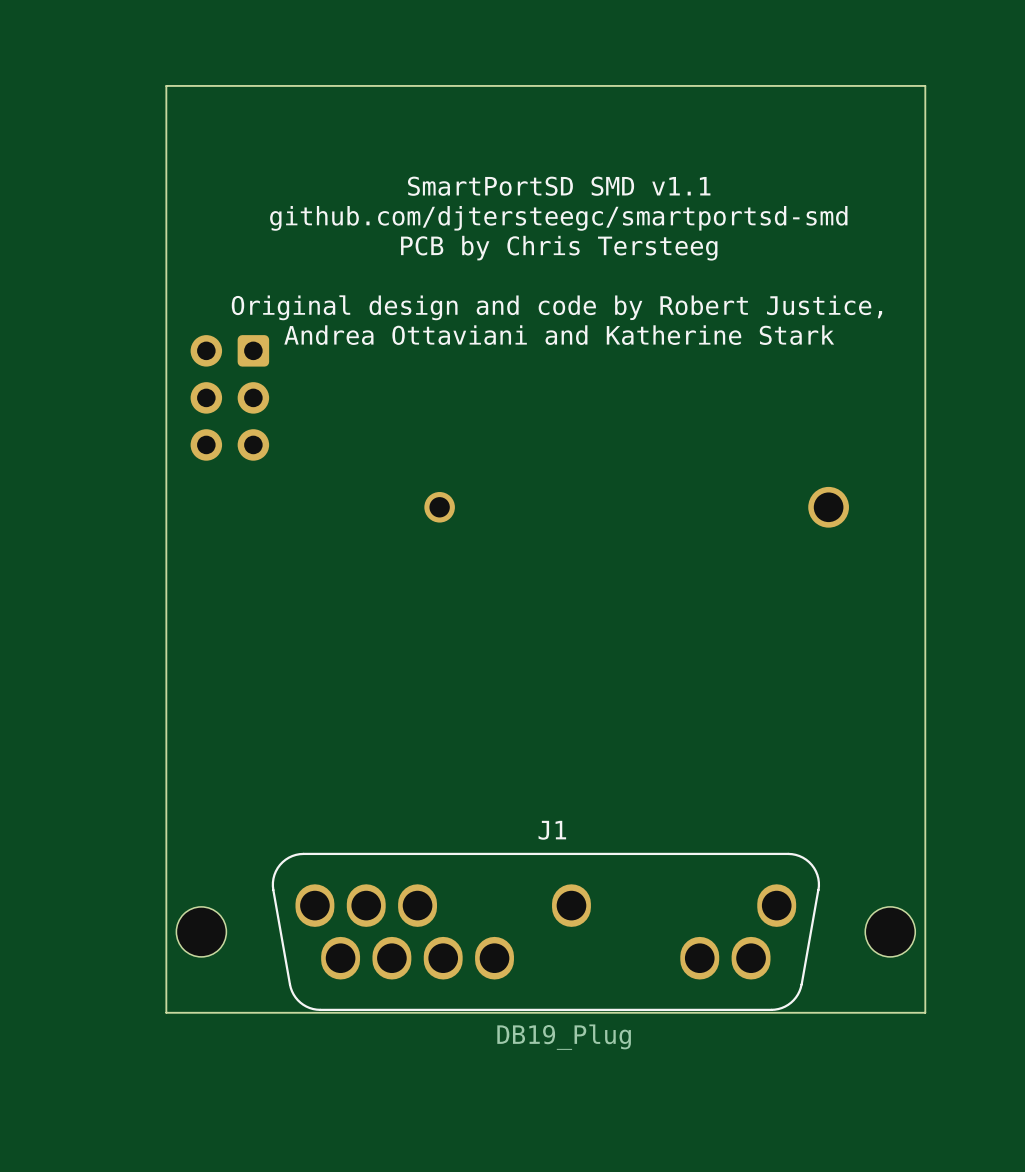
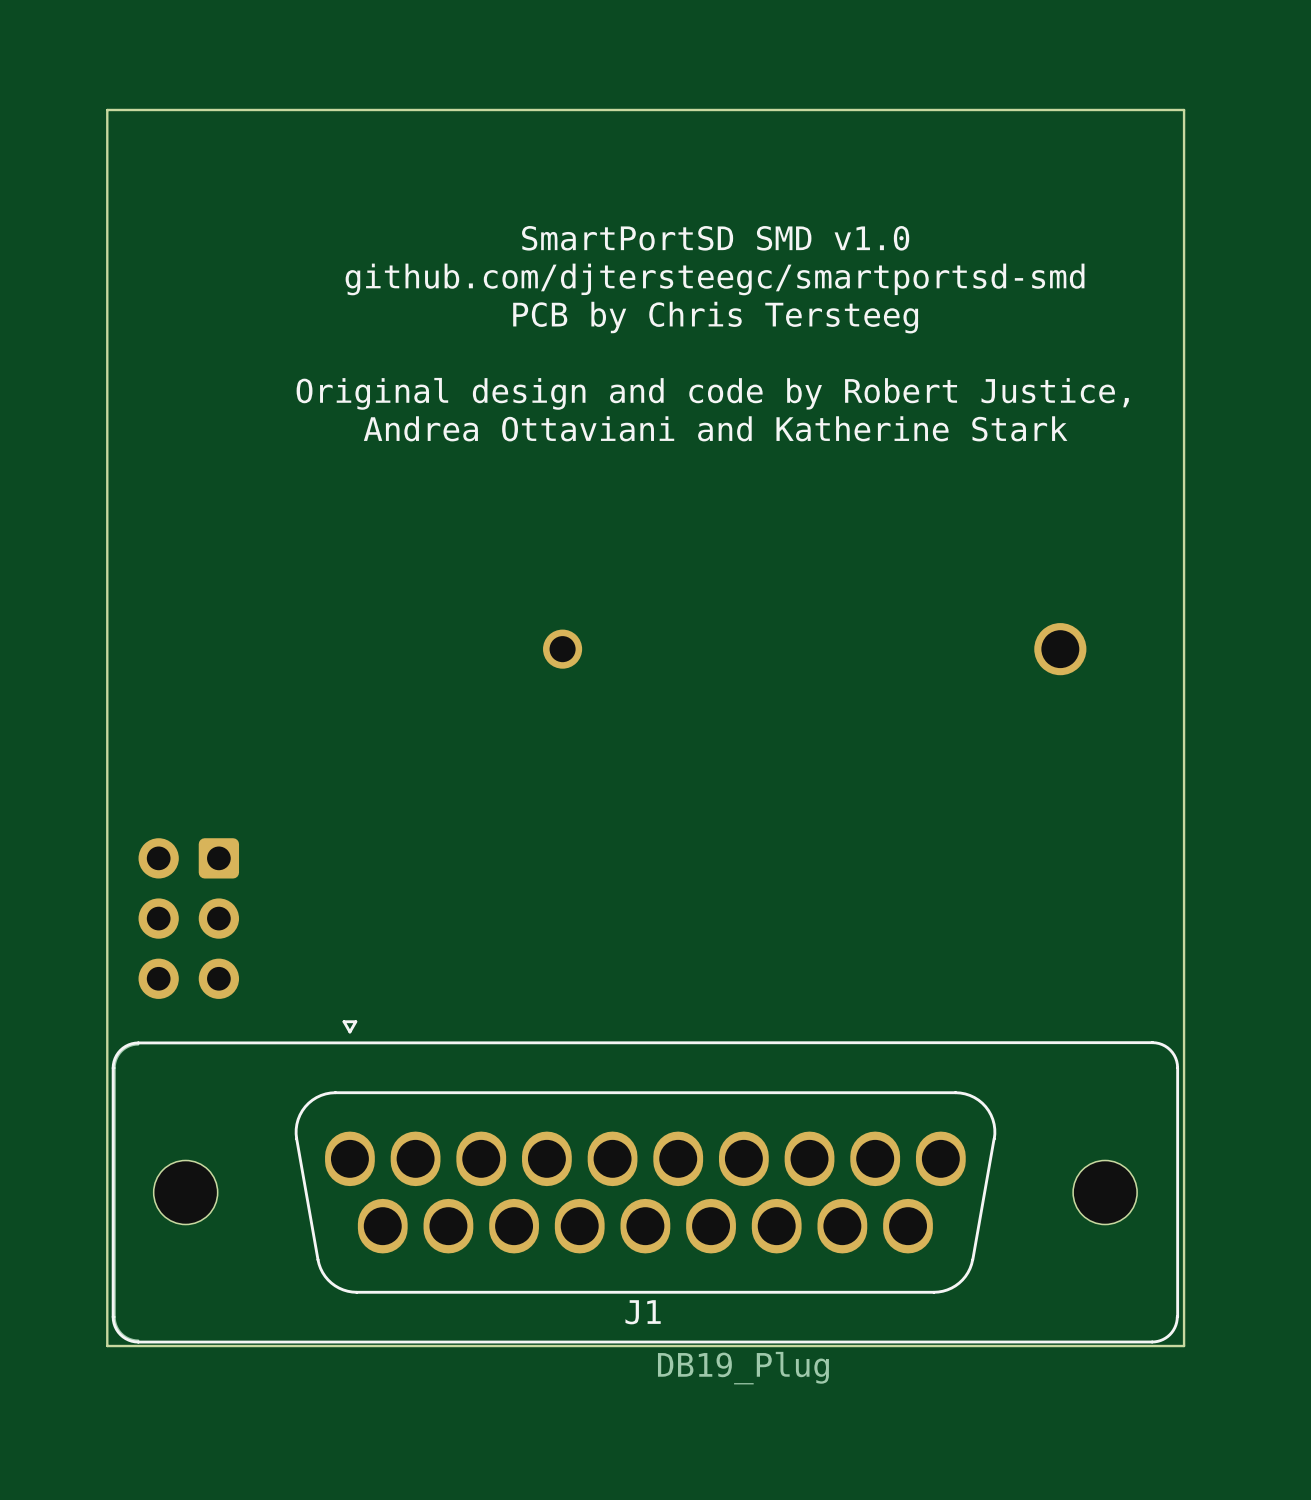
board edge: (166, 85) (166, 1012) (925, 1012) -> (212, 109) (107, 109) (107, 1346) (1184, 1346) (1184, 1296)
text: SmartPortSD SMD v1.1 (559, 186) -> SmartPortSD SMD v1.0 (715, 238)
part position: (229, 397) -> (188, 918)
J1 name position: J1 (552, 830) -> J1 (643, 1312)
J1 footprint: [176, 852, 916, 1011] -> [111, 1020, 1180, 1344]
J1 value position: DB19_Plug (564, 1037) -> DB19_Plug (743, 1368)

